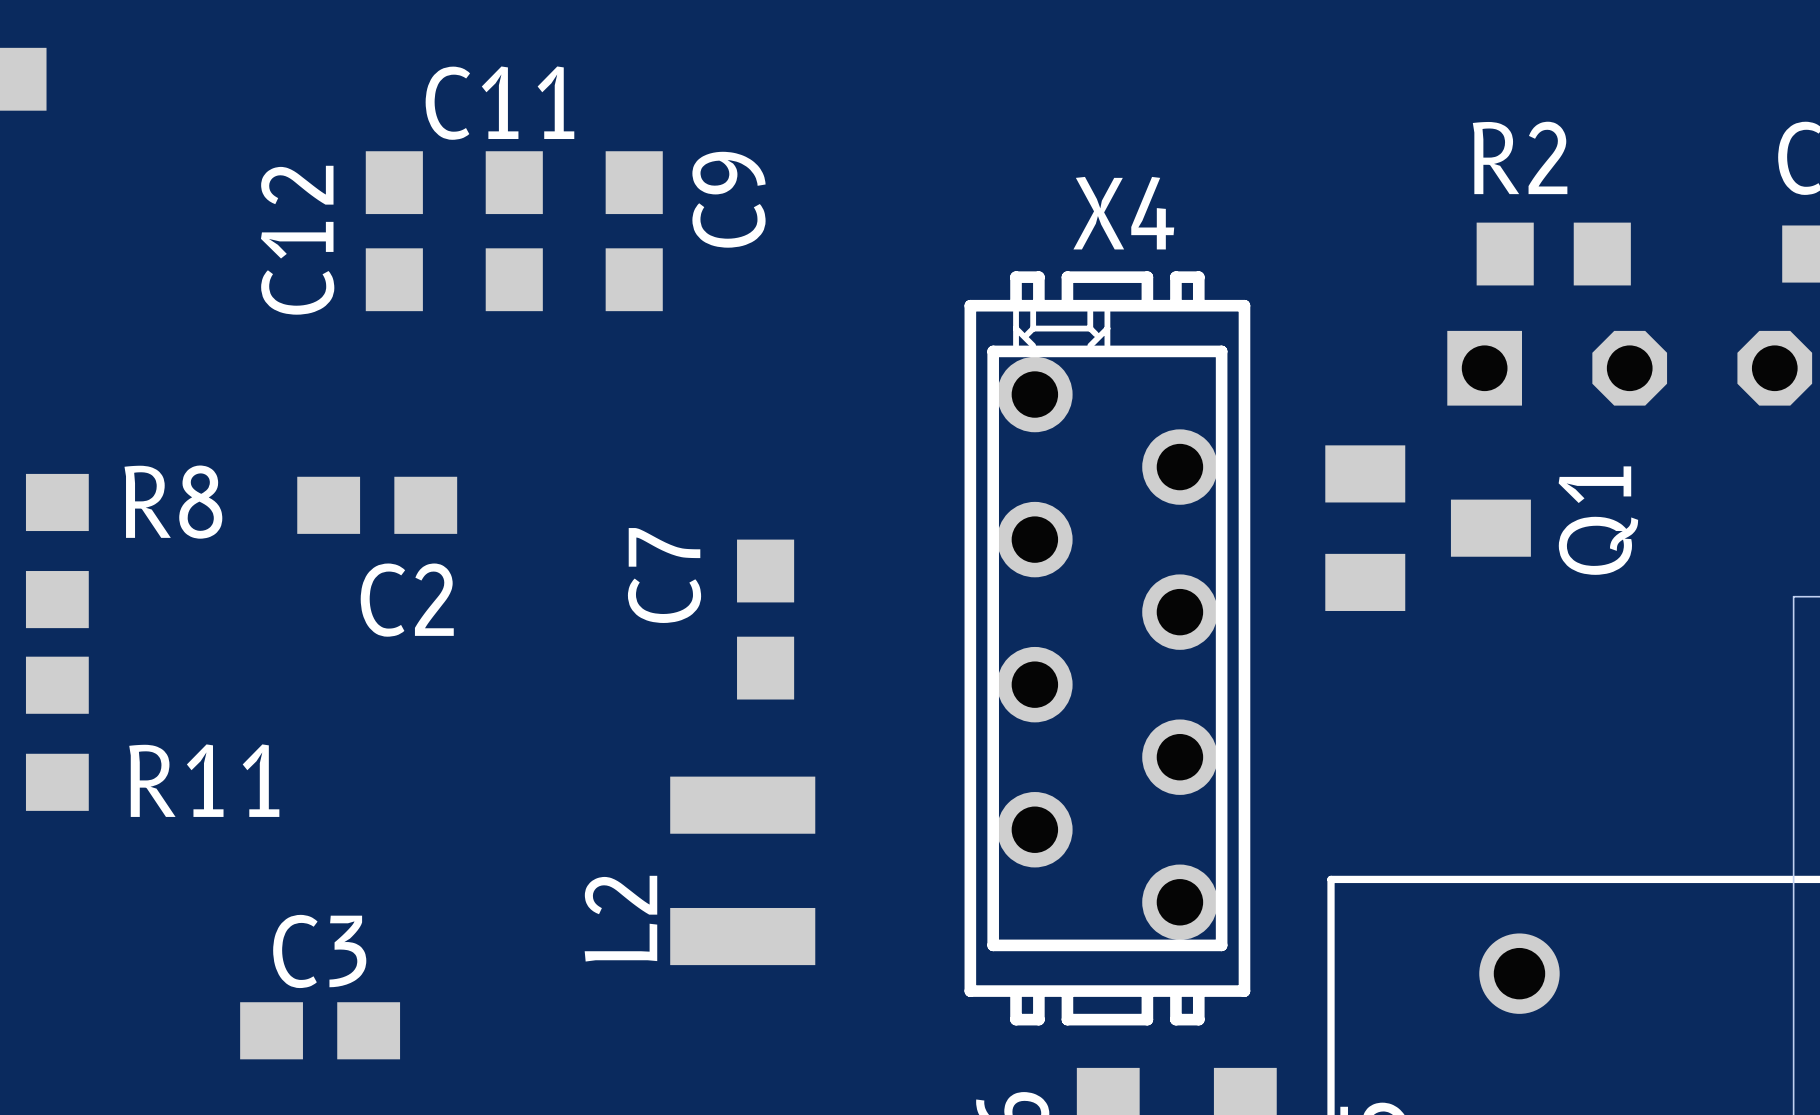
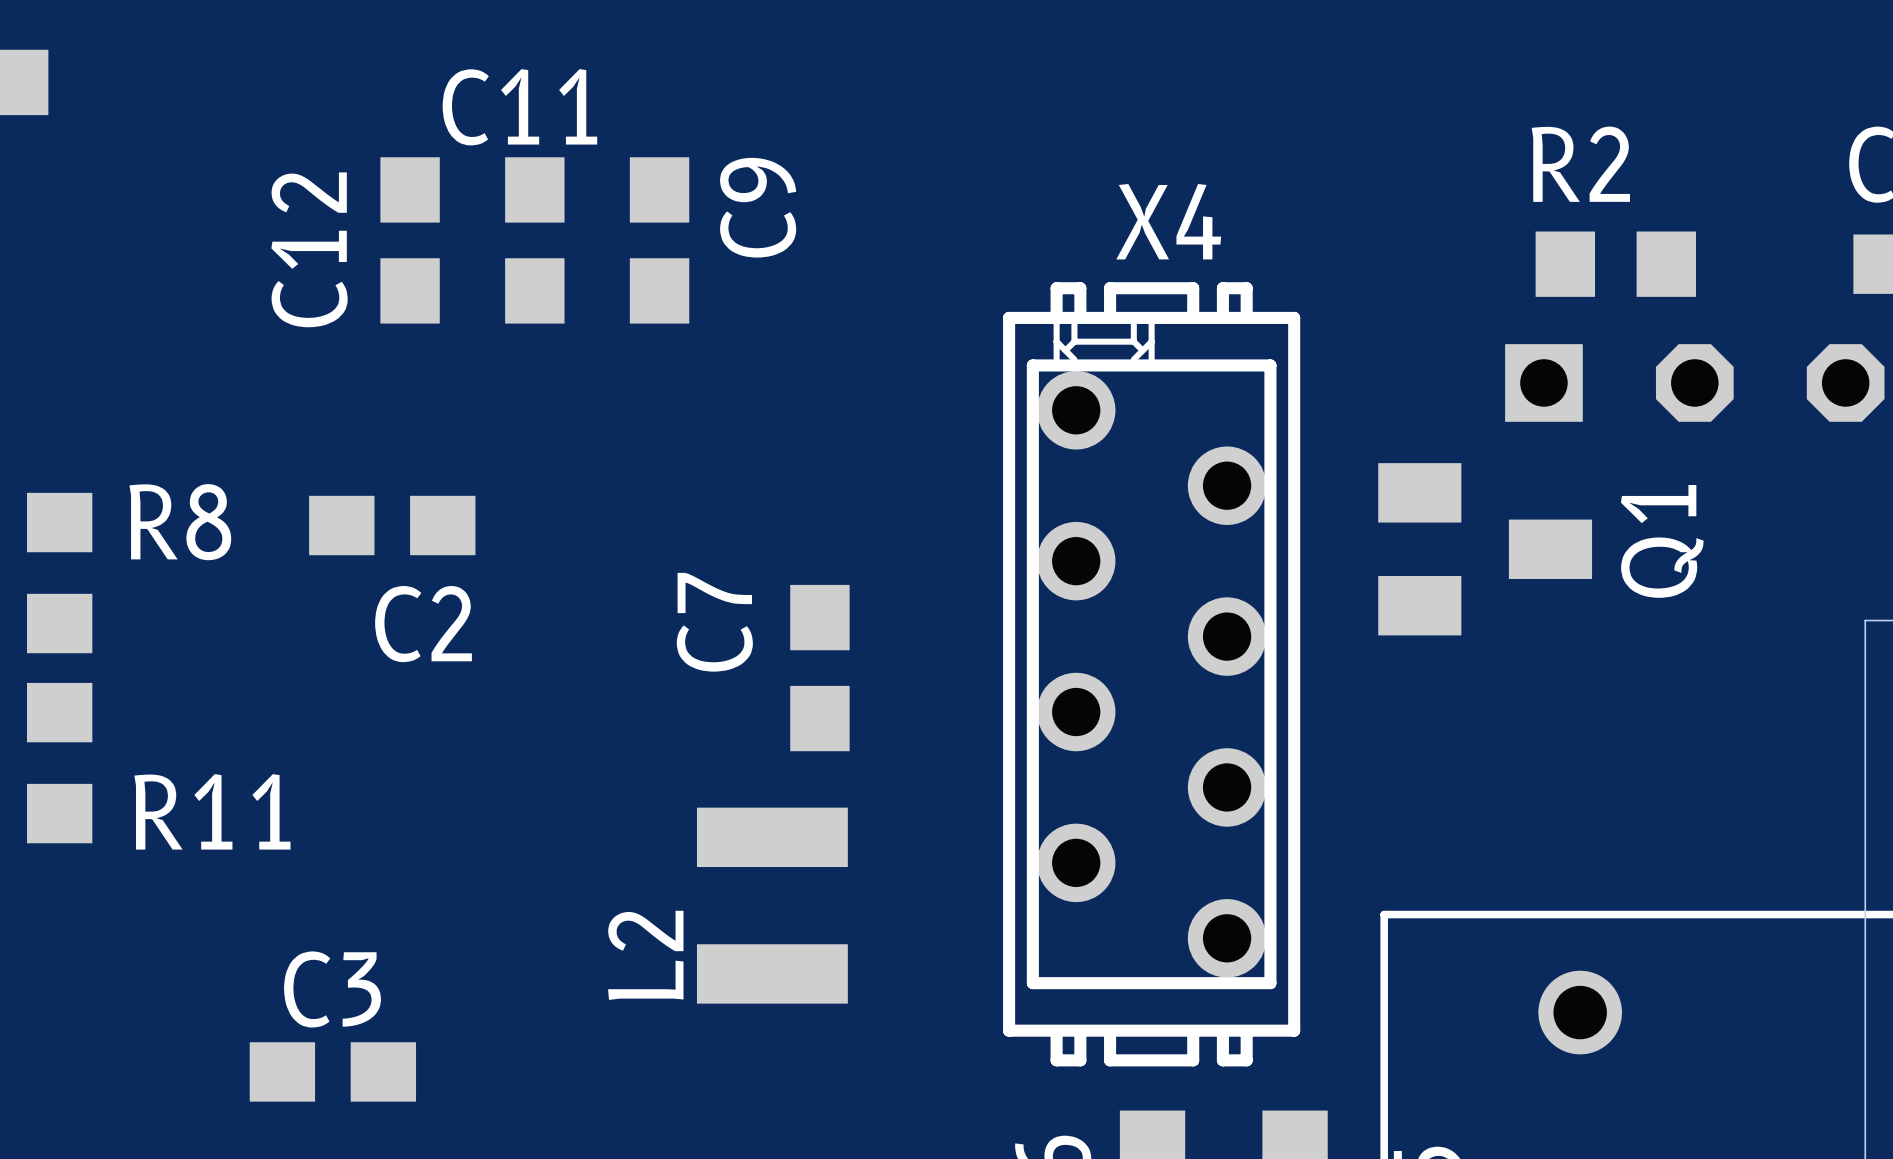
C7 position: (765, 619) -> (819, 668)

